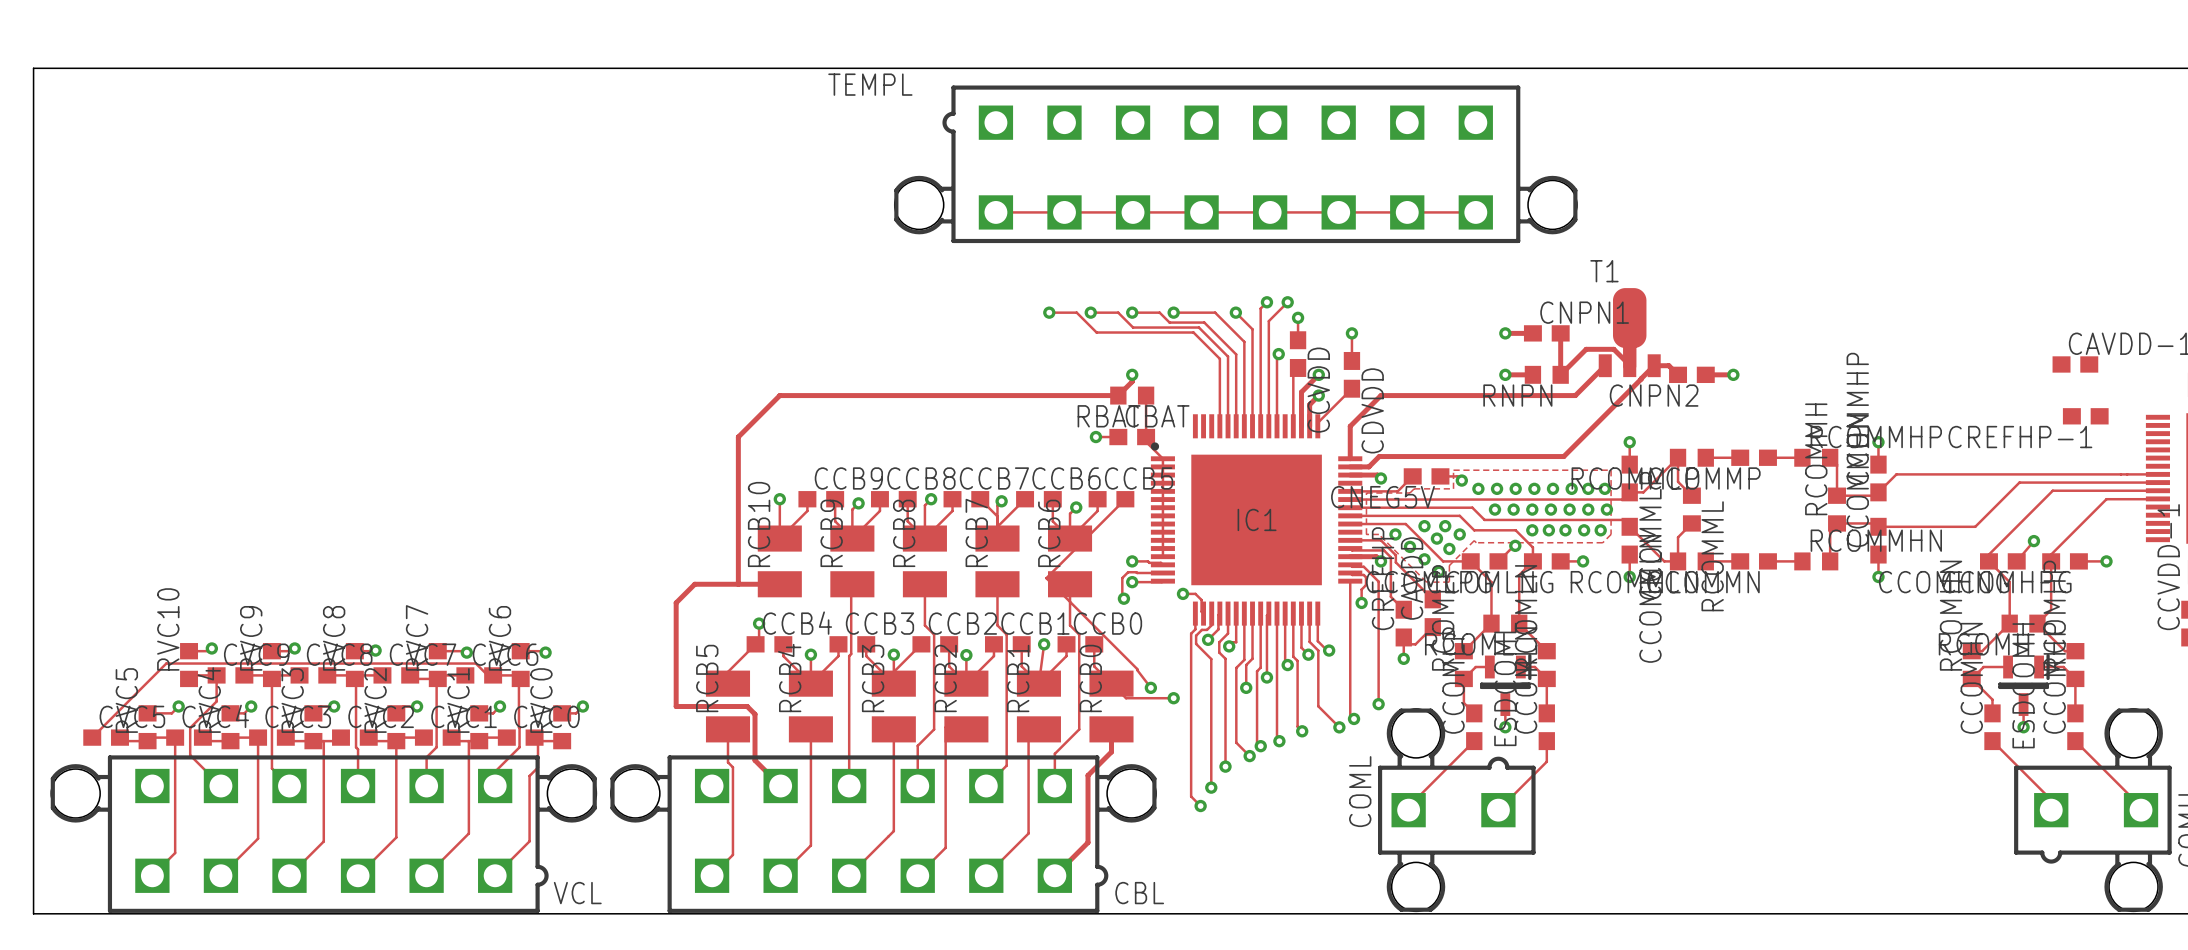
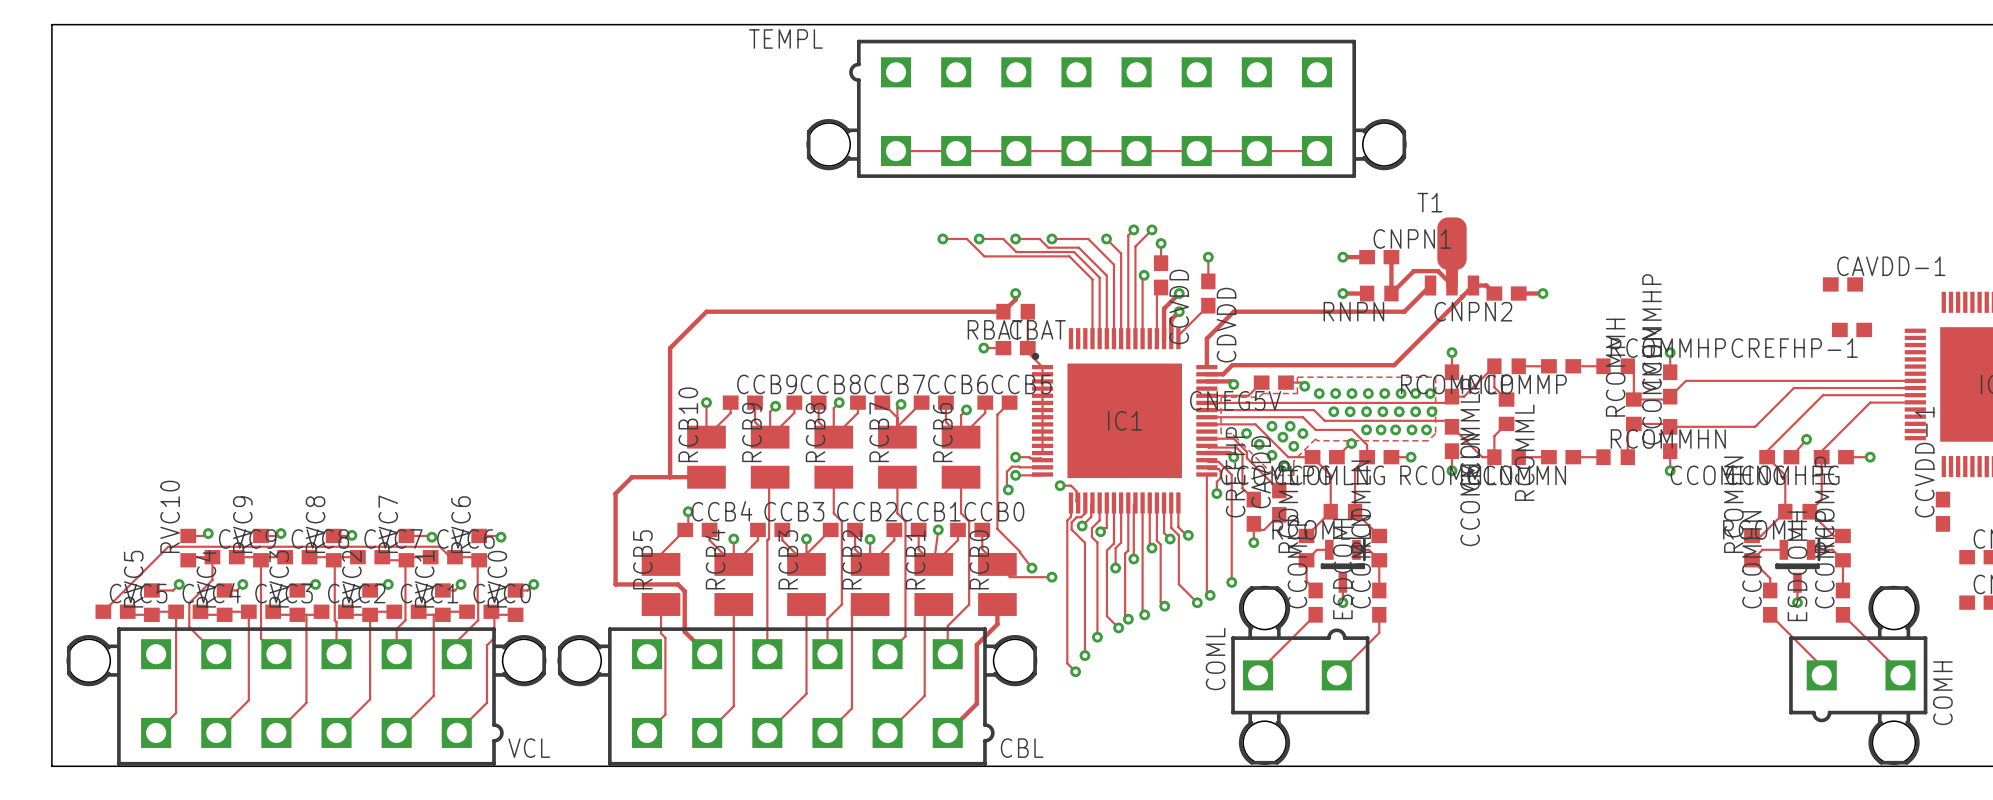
track: (1111, 513) (1046, 578) (1111, 643) -> (997, 414) (997, 529)

